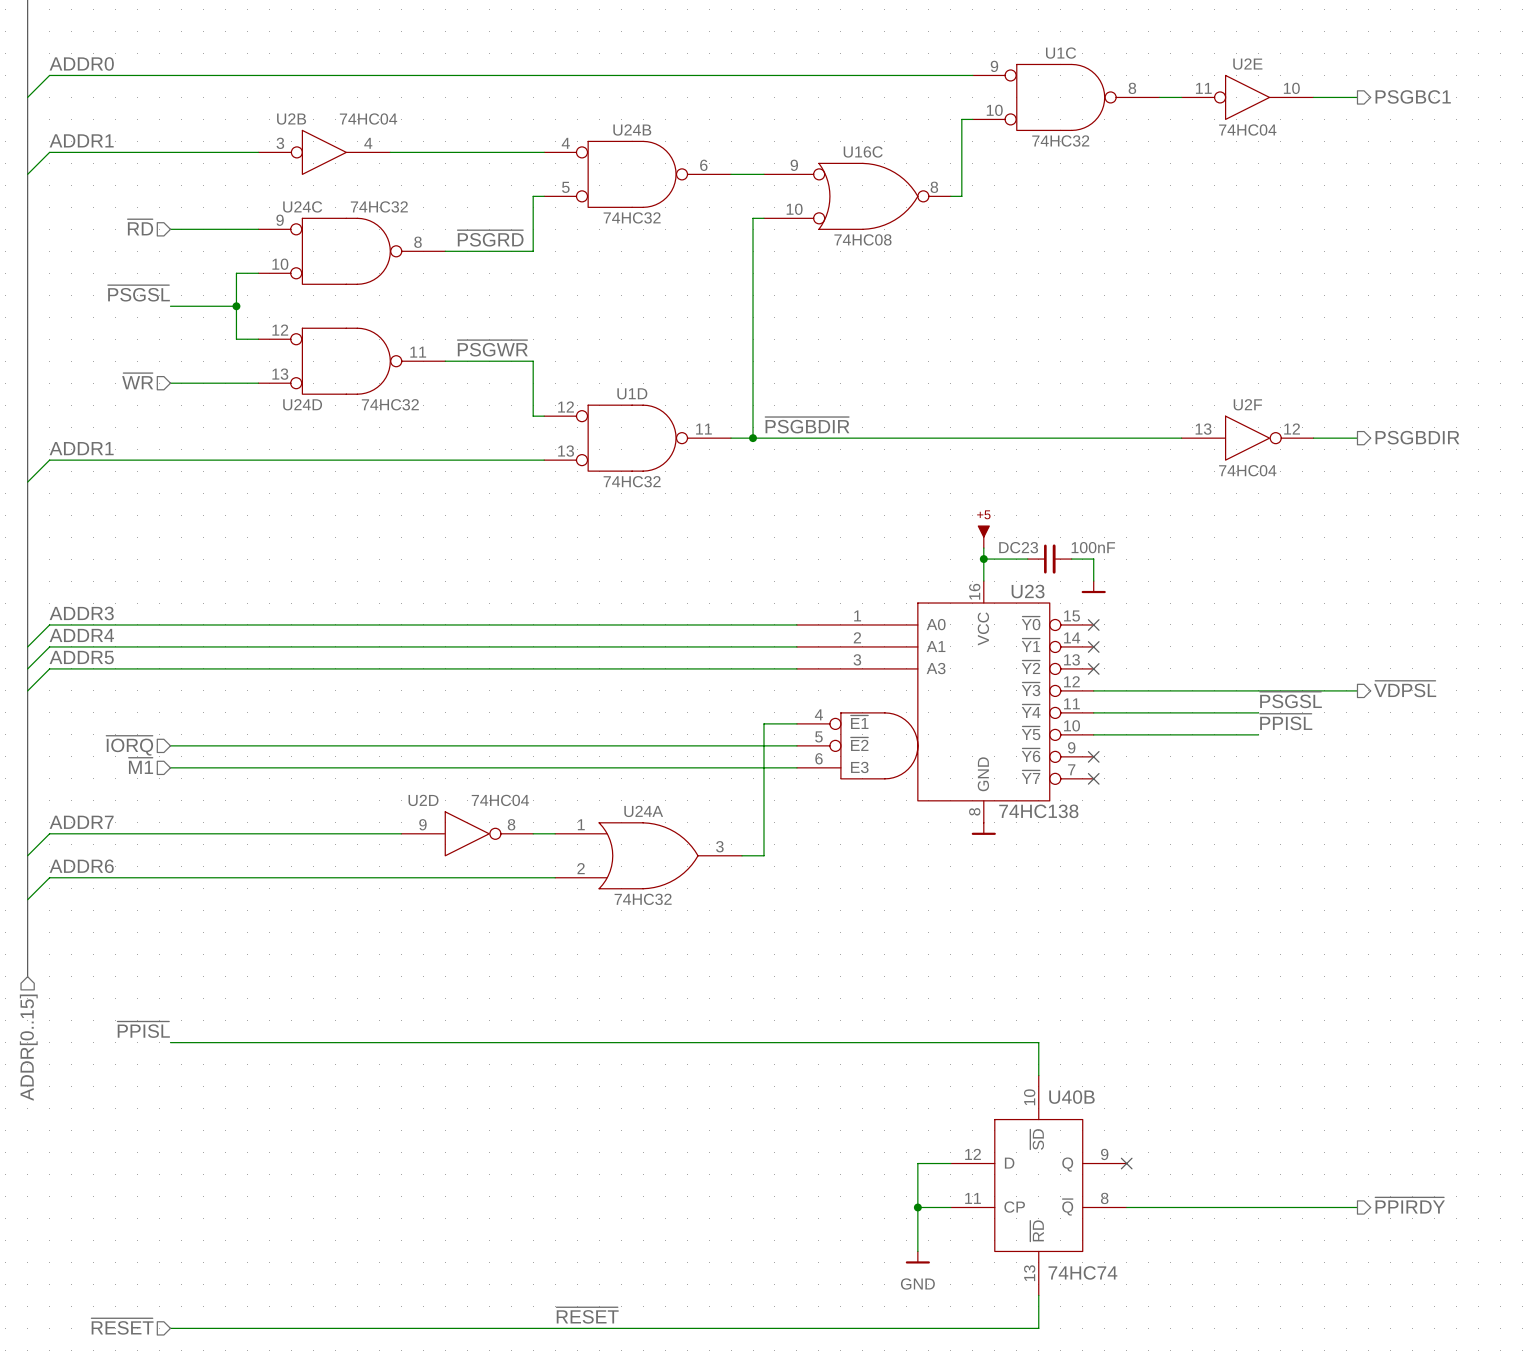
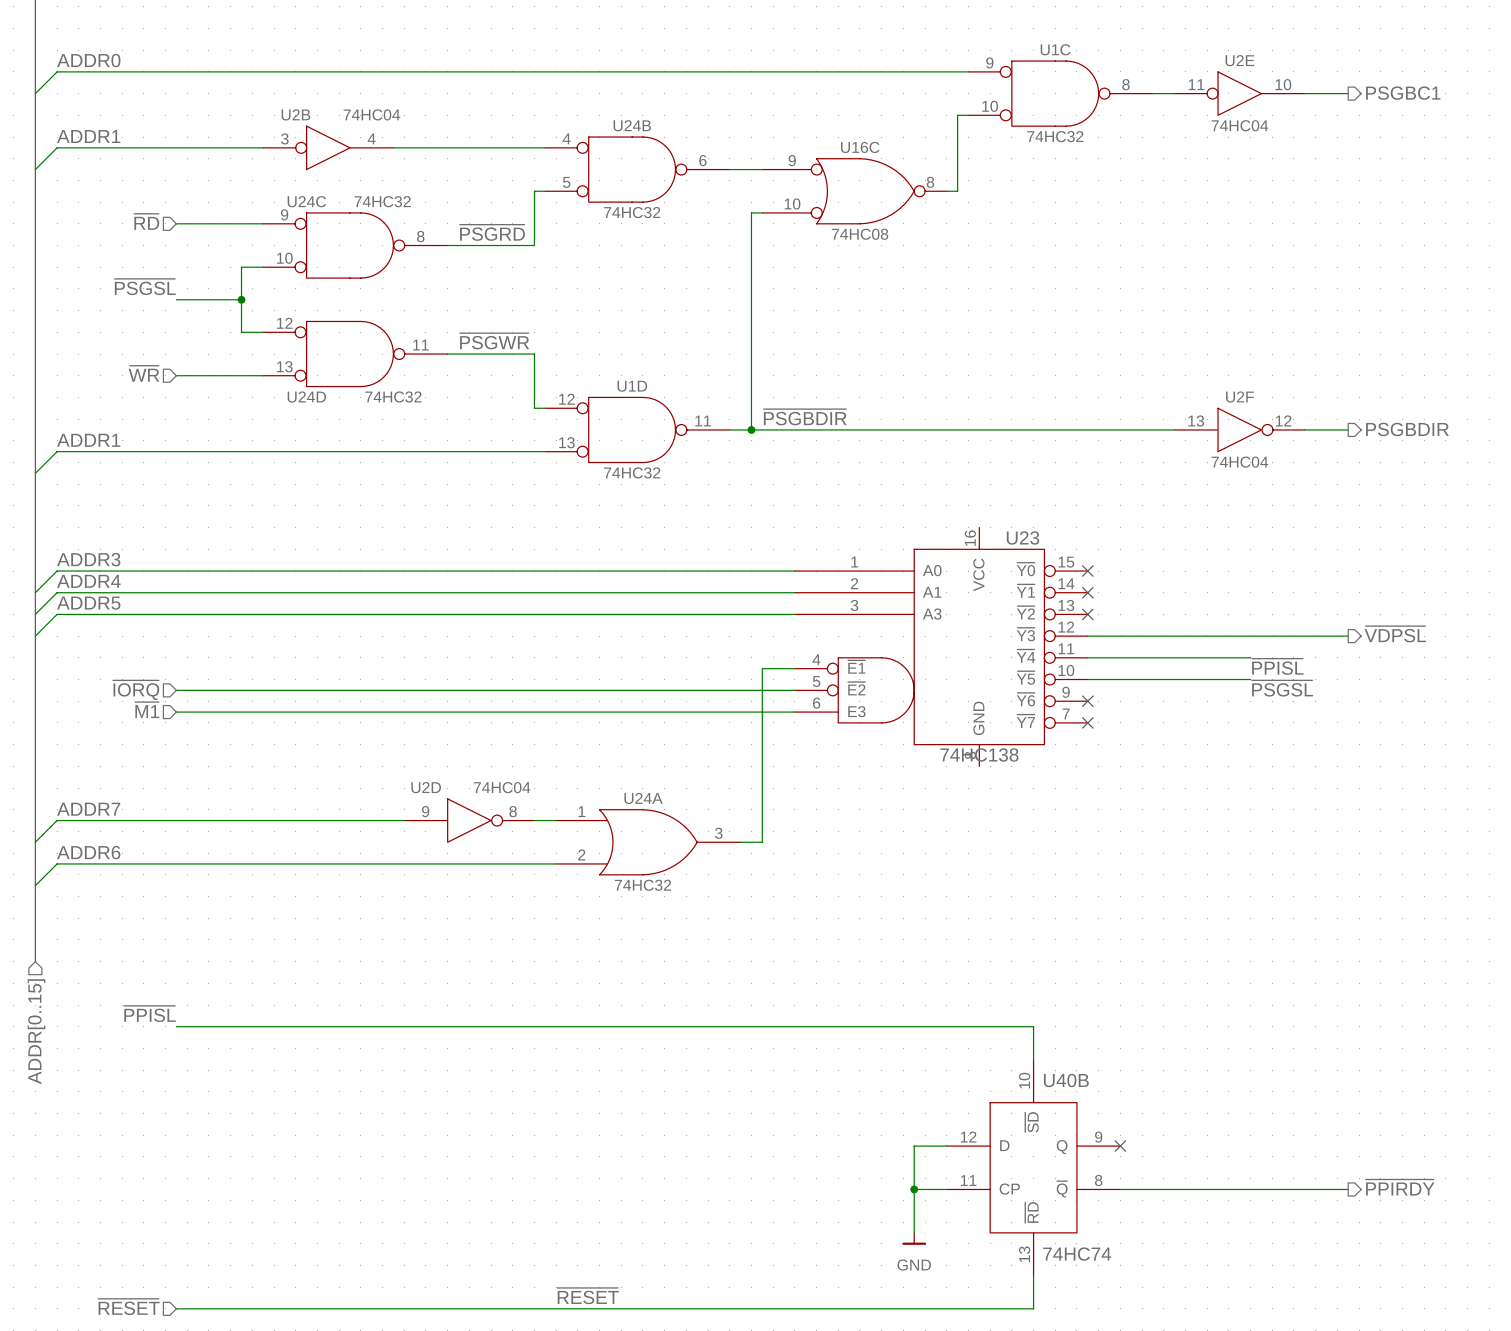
power symbol: (983, 537) -> none
wire: (983, 548) (983, 581) -> none
junction: (983, 559) -> none
DC23: 100nF (1049, 559) -> none
wire: (1071, 559) (1093, 559) (1093, 581) -> none
label: none -> ADDR3 (88, 559)
no-connect mark: none -> (1087, 571)
power symbol: (1093, 587) -> none
no-connect mark: none -> (1087, 592)
label: ADDR3 (81, 613) -> ADDR5 (88, 603)
label position: ADDR4 (81, 635) -> ADDR4 (88, 581)
wire: (796, 646) (49, 646) (27, 668) -> (794, 571) (57, 571) (35, 592)
wire: none -> (1087, 636) (1348, 636)
no-connect mark: (1093, 646) -> none
label: ADDR5 (81, 657) -> none
wire: (796, 668) (49, 668) (27, 690) -> (794, 592) (57, 592) (35, 614)
no-connect mark: (1093, 668) -> none
wire: none -> (794, 668) (762, 668) (762, 712) (176, 712)
hierarchical label position: ~{VDPSL} (1405, 689) -> ~{VDPSL} (1395, 634)
wire: (1258, 690) (1357, 690) -> none
U23 position: (945, 701) -> (941, 646)
wire: (1093, 712) (1258, 712) -> none
no-connect mark: none -> (1087, 701)
label position: ~{PPISL} (1286, 721) -> ~{PPISL} (1277, 666)
wire: (1093, 734) (1258, 734) -> (1087, 657) (1250, 657)
no-connect mark: none -> (1087, 722)
hierarchical label position: ~{IORQ} (129, 745) -> ~{IORQ} (136, 690)
wire: (170, 745) (796, 745) -> none
no-connect mark: (1093, 756) -> none
hierarchical label position: ~{M1} (140, 765) -> ~{M1} (147, 710)
wire: (170, 767) (796, 767) -> (176, 690) (794, 690)
no-connect mark: (1093, 778) -> none
U23 value position: 74HC138 (1038, 811) -> 74HC138 (979, 754)
power symbol: (983, 828) -> none

